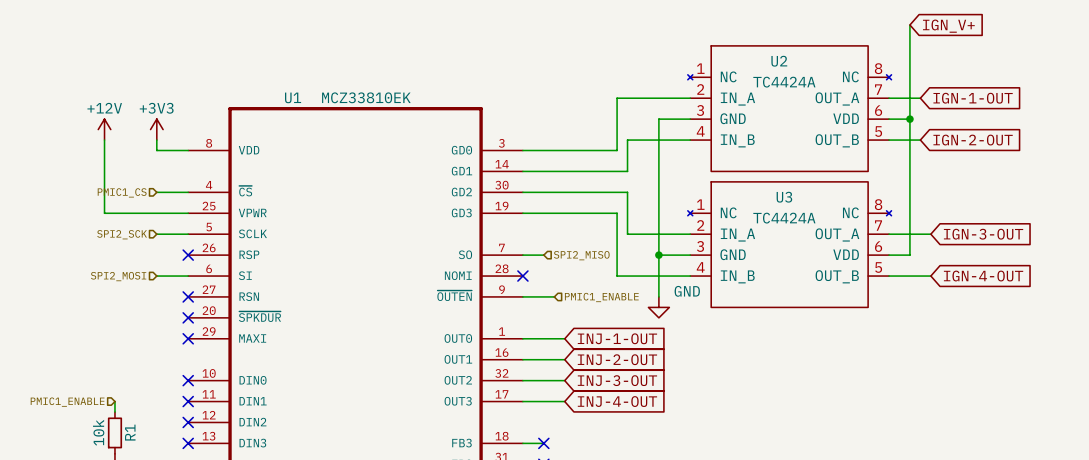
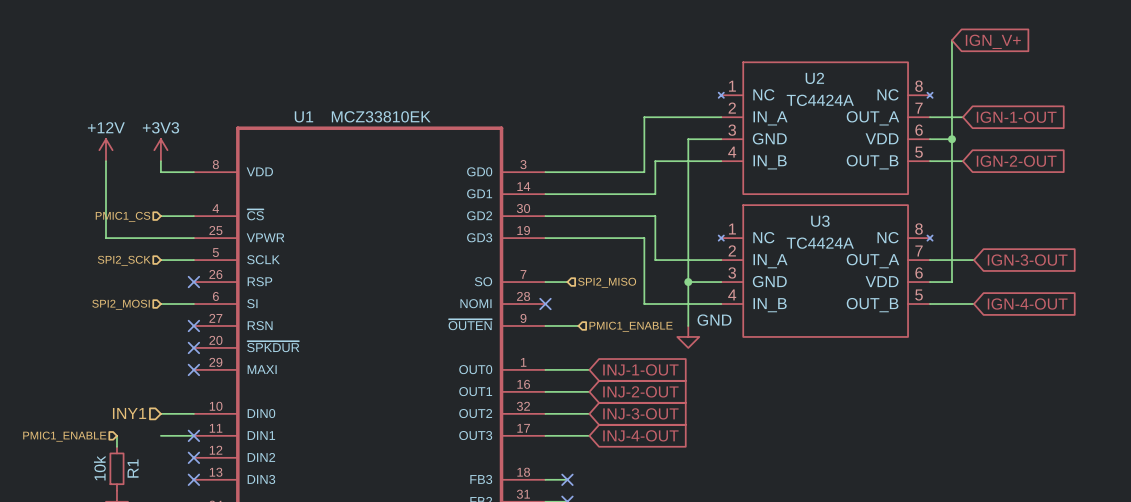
hierarchical label: none -> INY1 (129, 413)
wire: none -> (160, 413) (193, 413)
no-connect mark: (188, 380) -> none
wire: none -> (160, 435) (193, 435)

